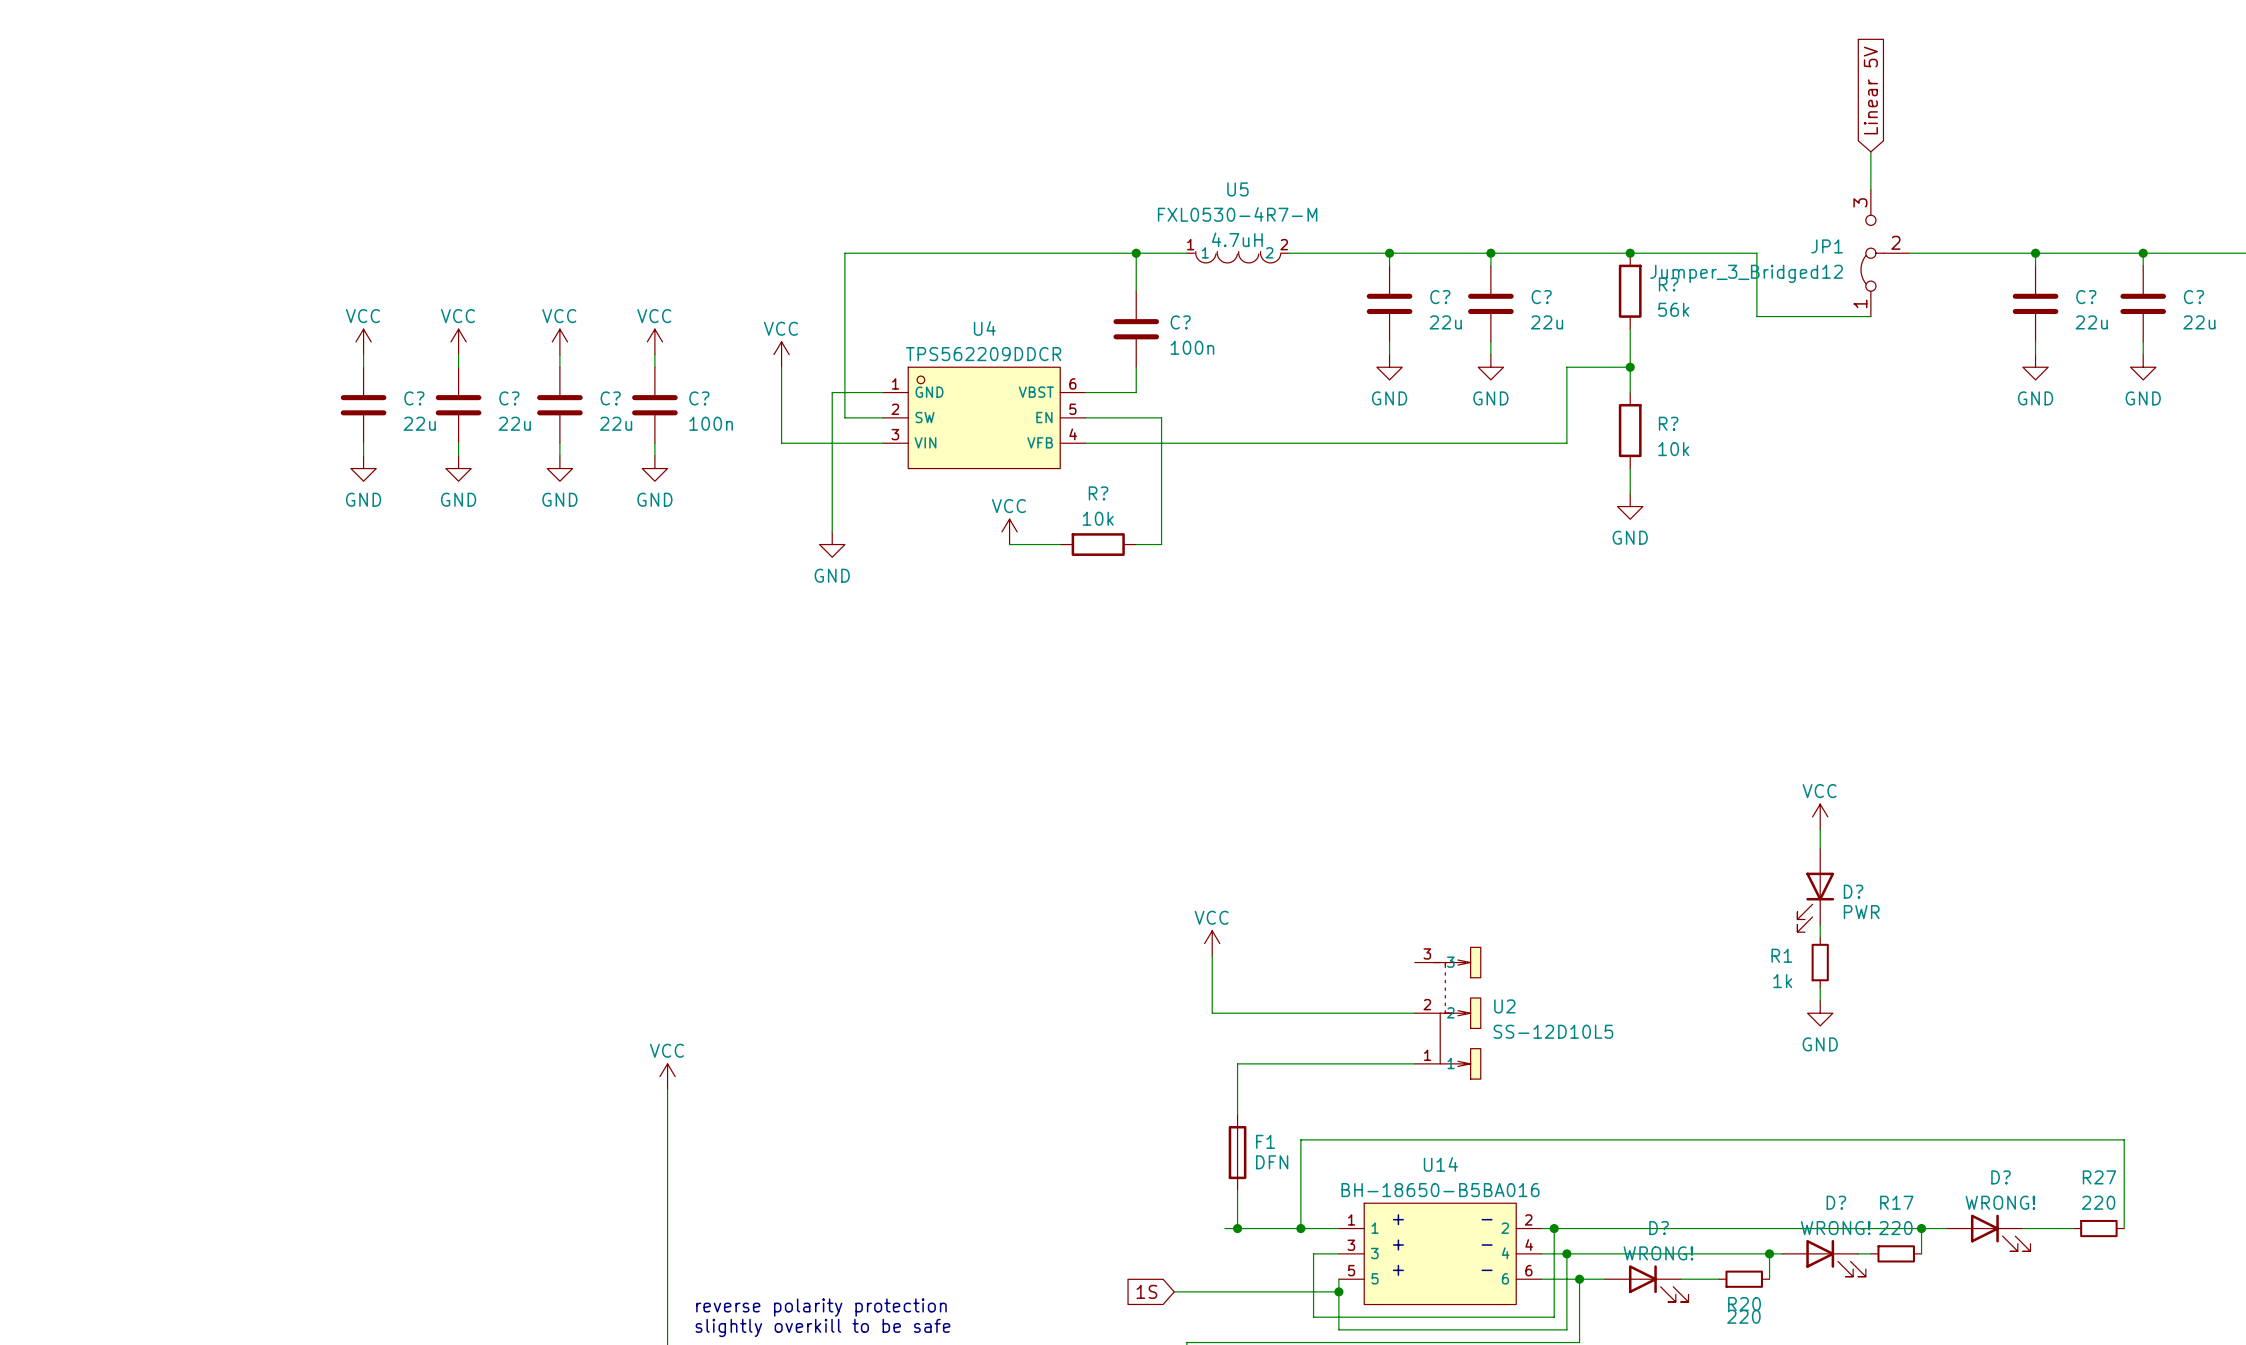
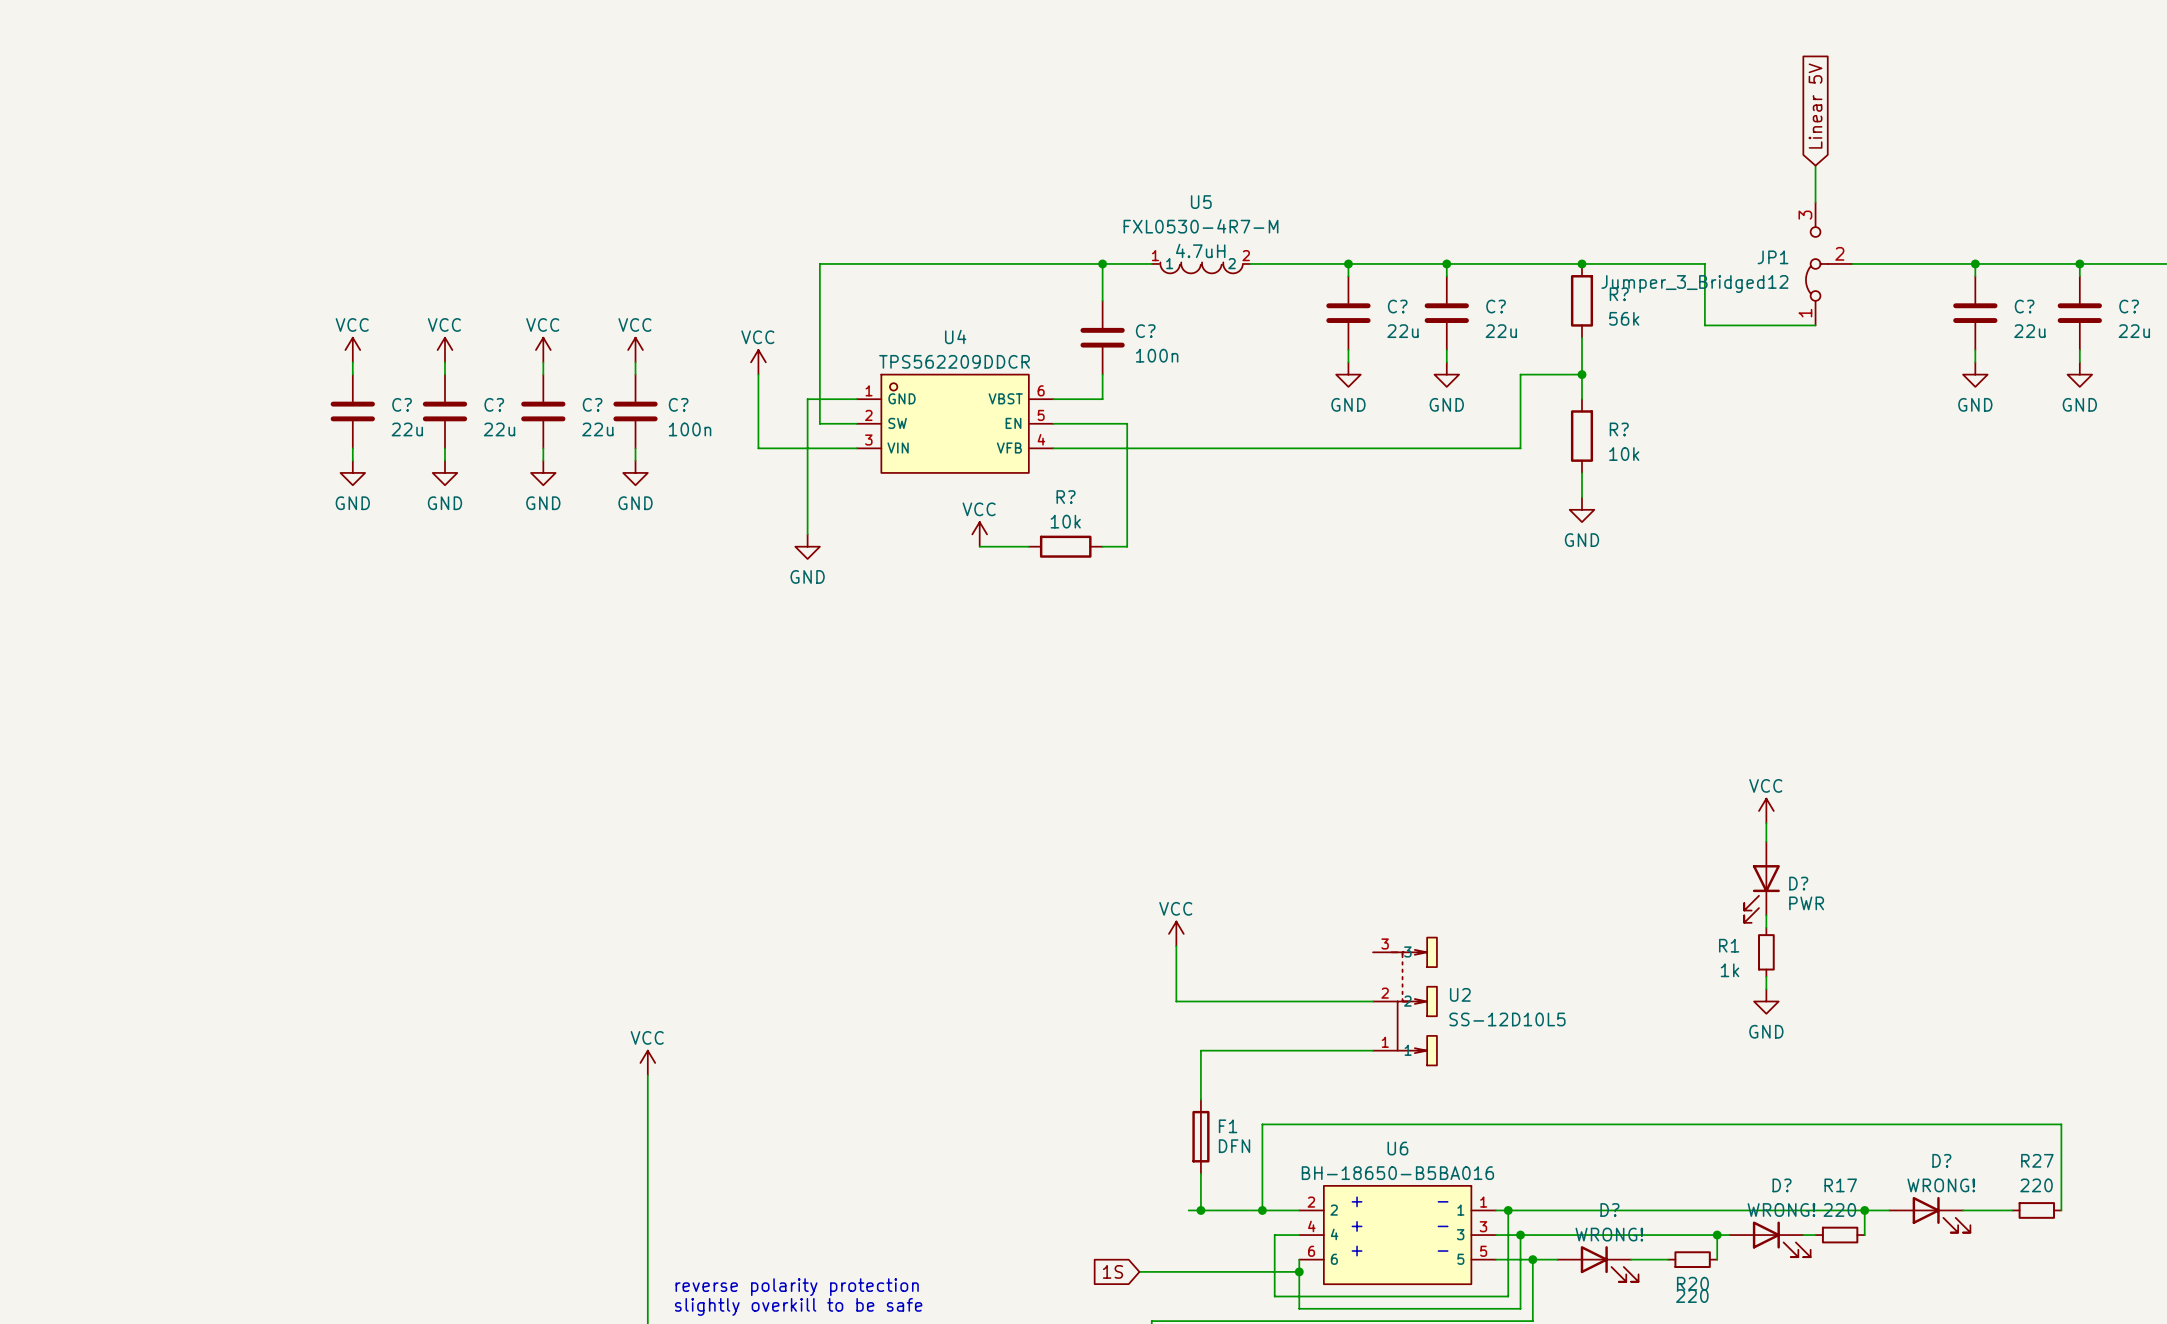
U14 name: U14 (1440, 1164) -> U6 (1397, 1148)
U14 flip: as is (1440, 1253) -> left-right (1397, 1235)

